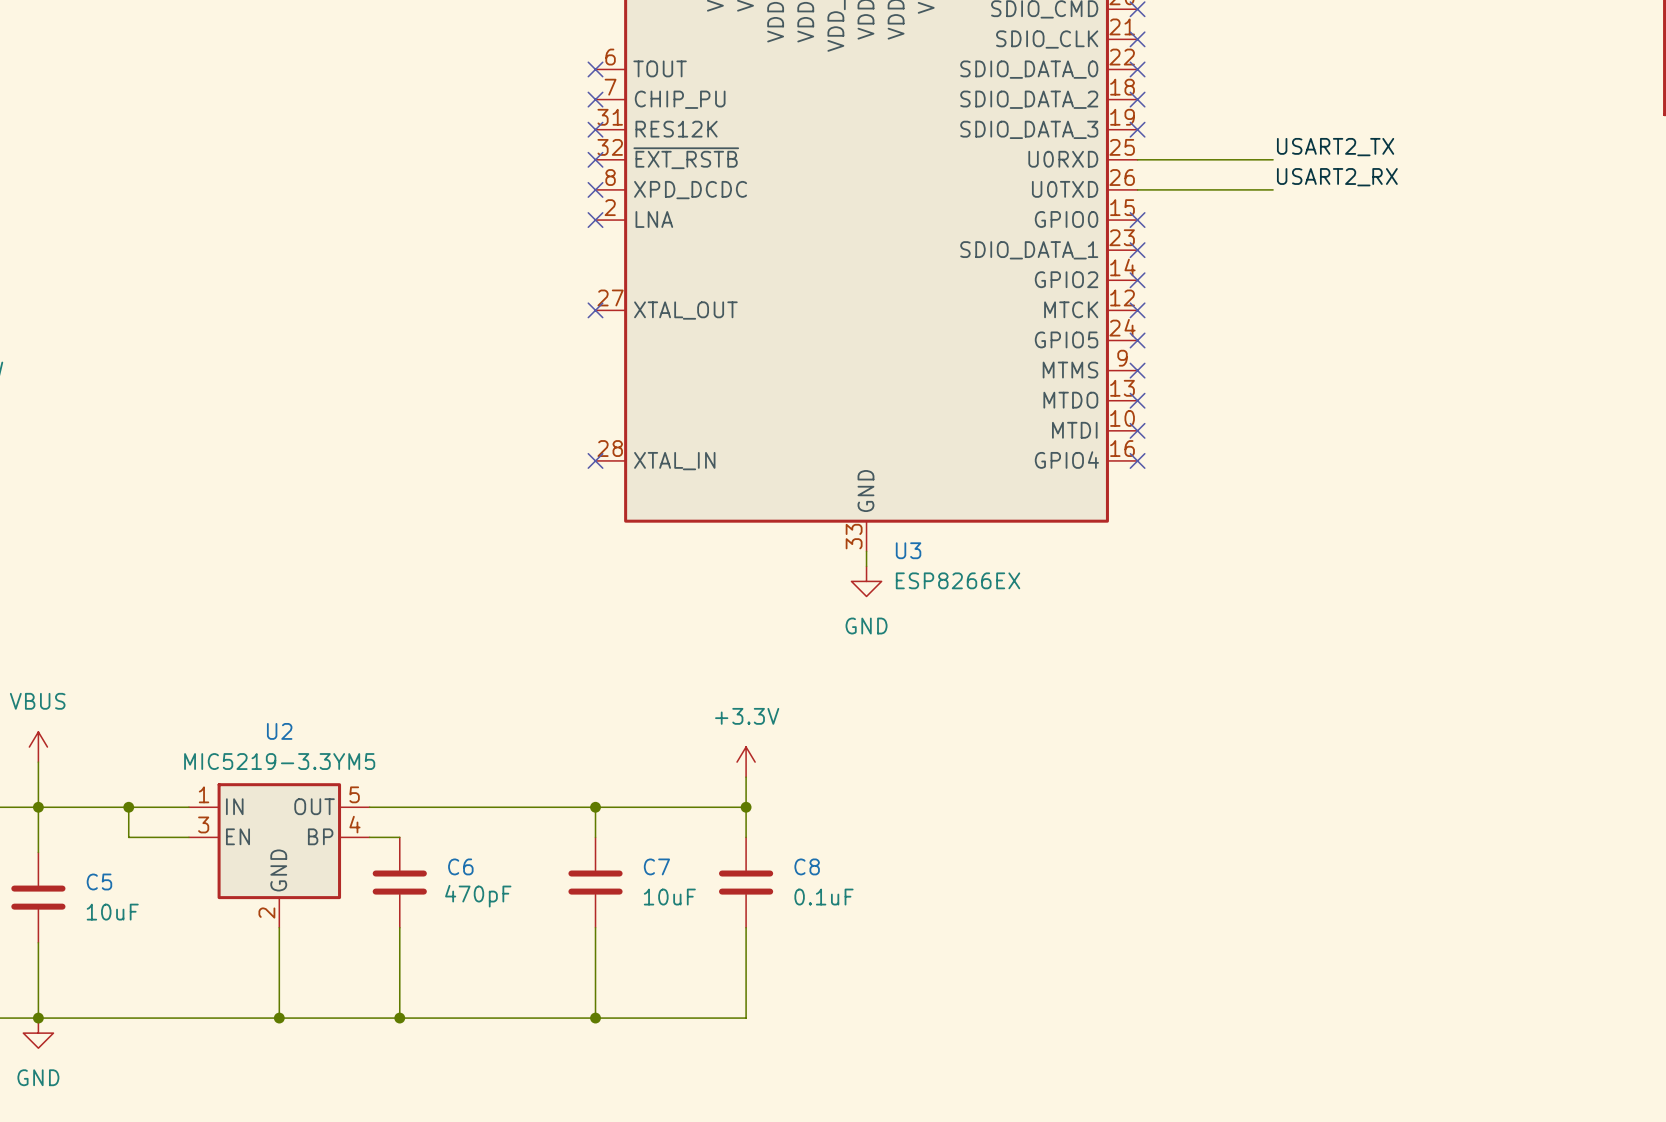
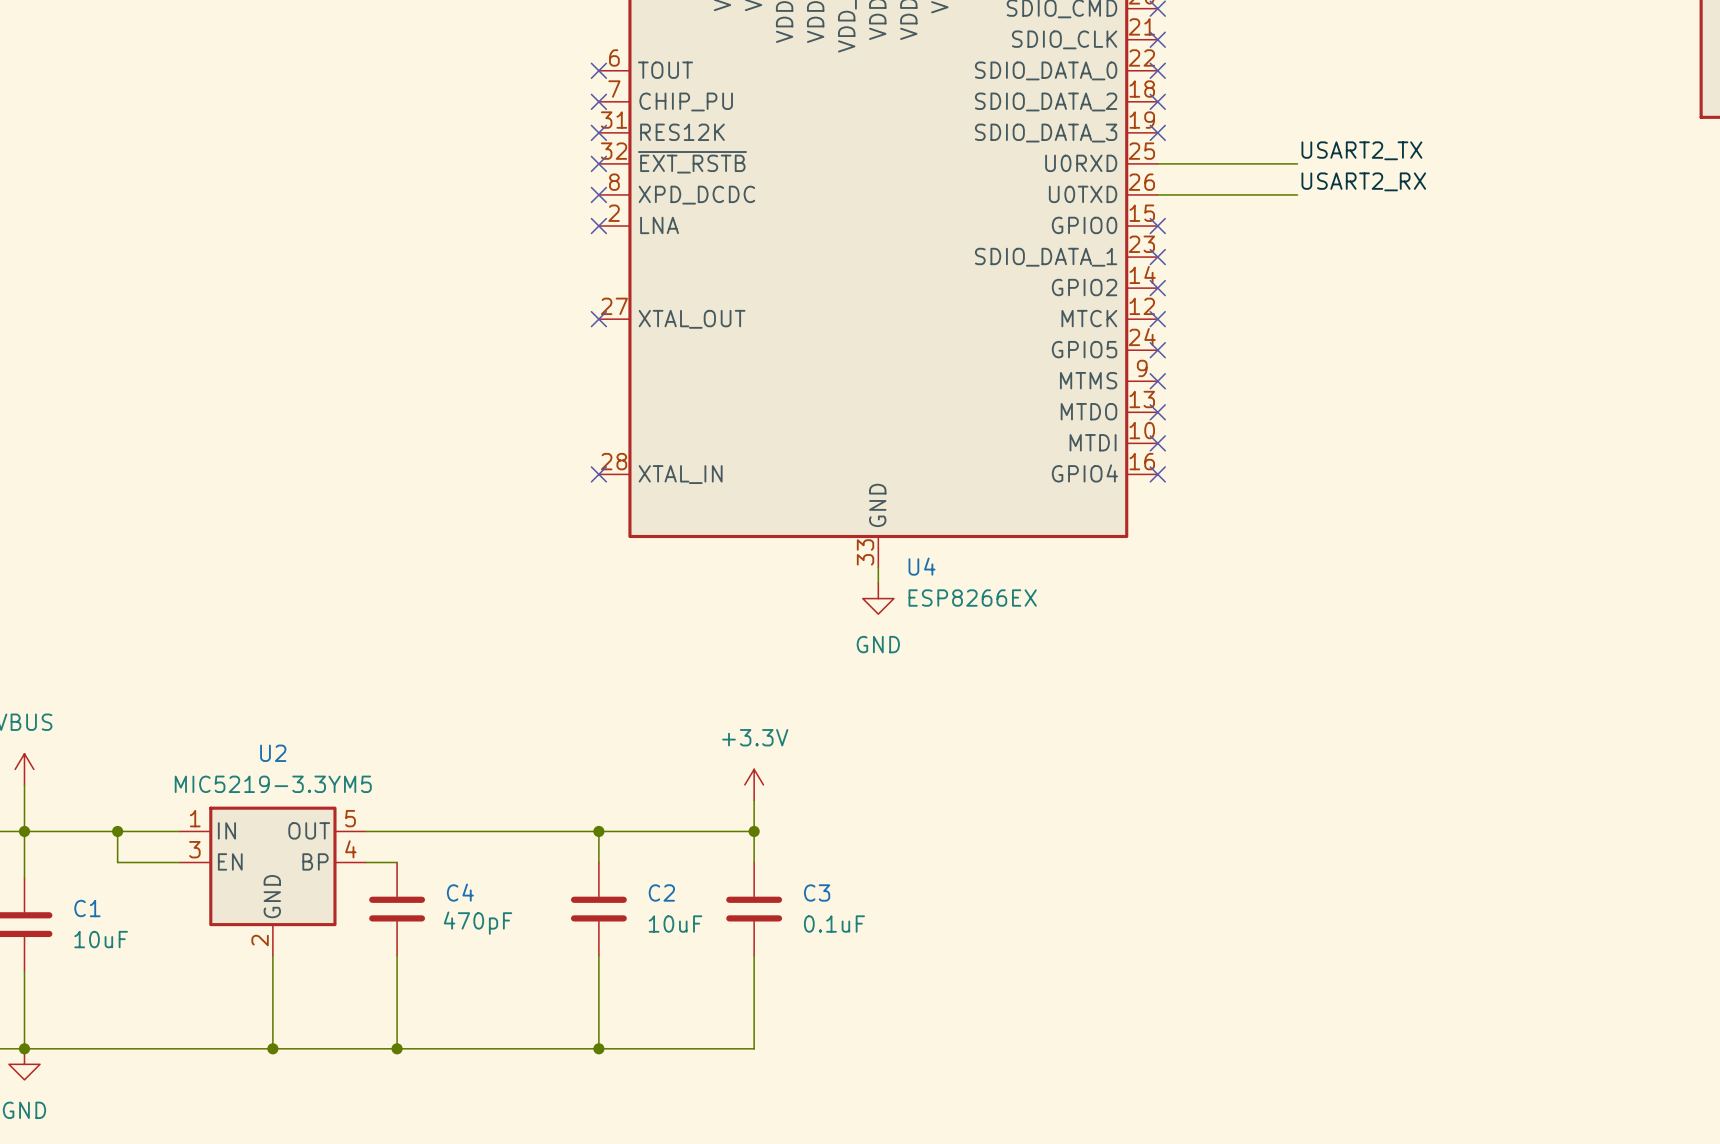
U3 name: U3 (908, 550) -> U4 (922, 566)
C6 name: C6 (460, 866) -> C4 (460, 892)
C7 name: C7 (656, 866) -> C2 (661, 892)
C8 name: C8 (807, 866) -> C3 (817, 892)
C5 name: C5 (99, 881) -> C1 (87, 908)

